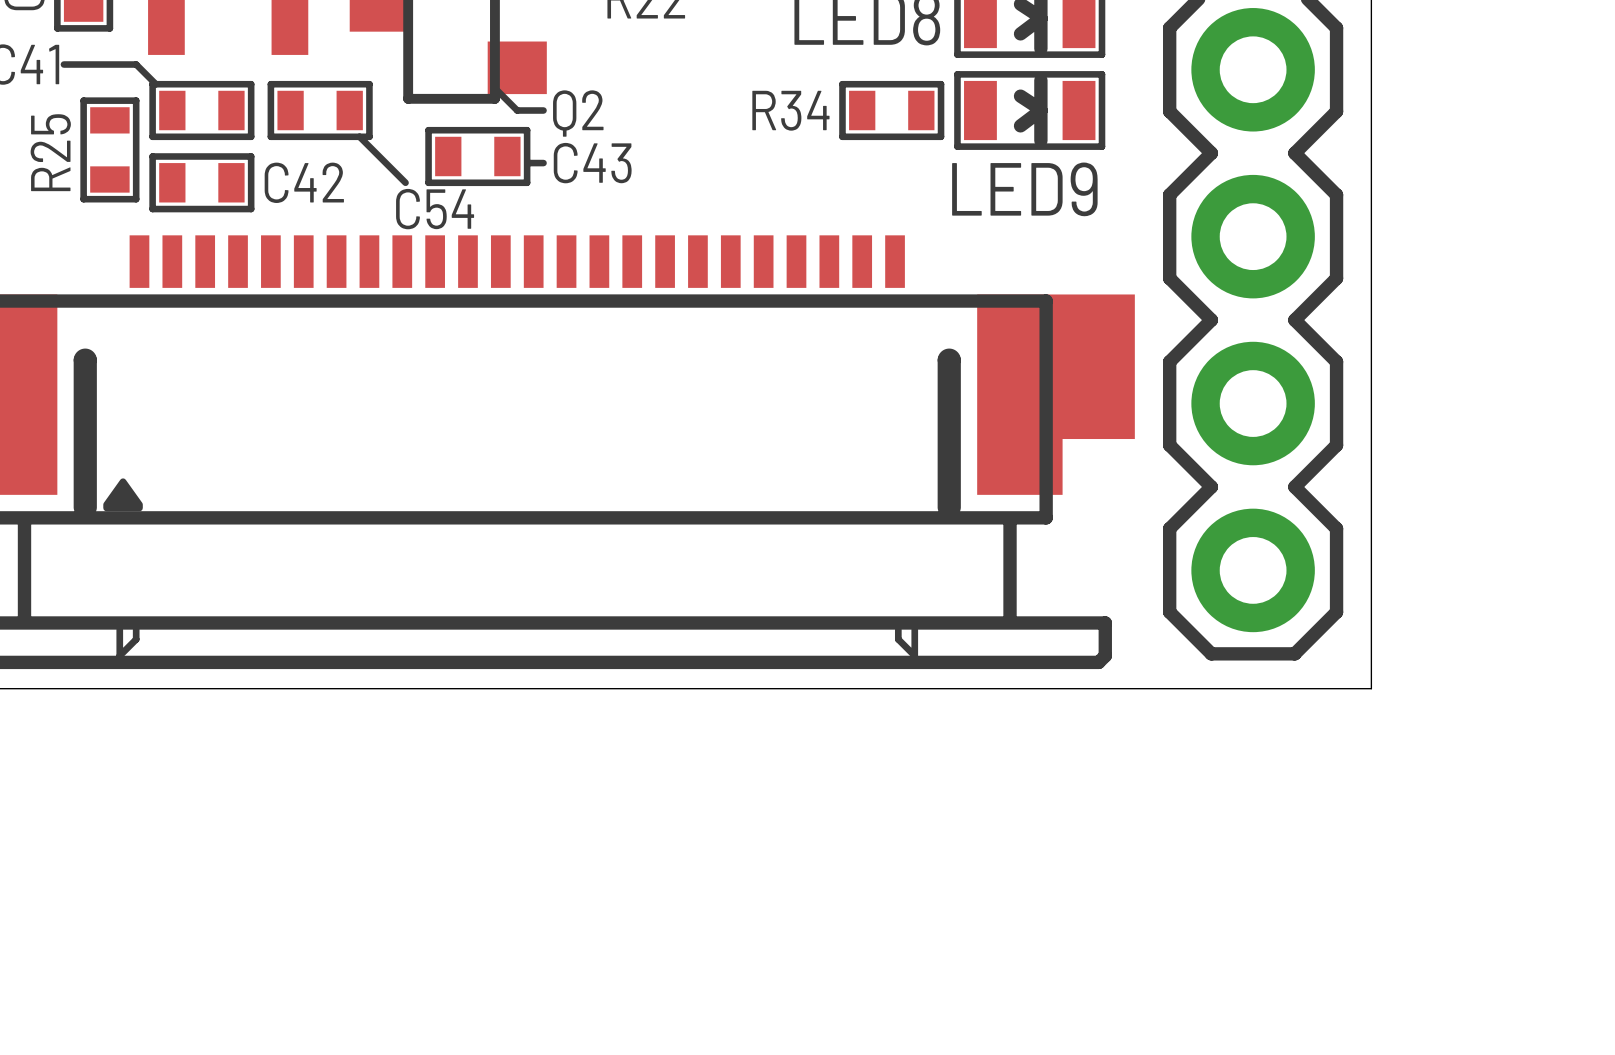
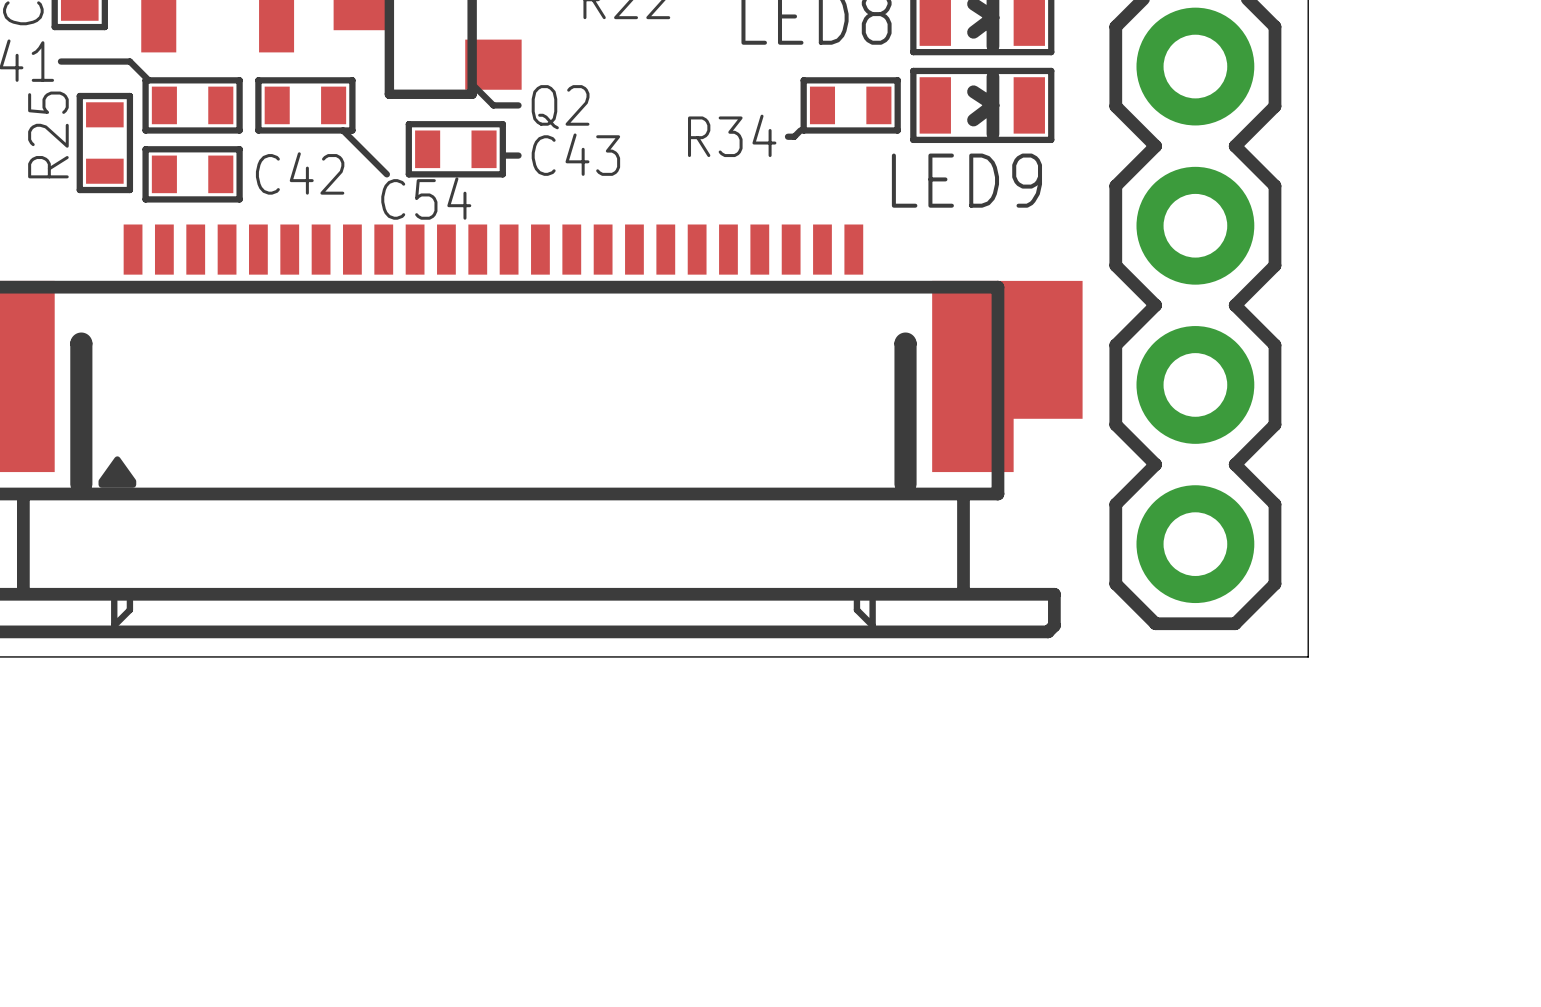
R34 name position: R34 (790, 110) -> R34 (732, 135)
line: none -> (800, 130) (794, 136) (788, 136)

